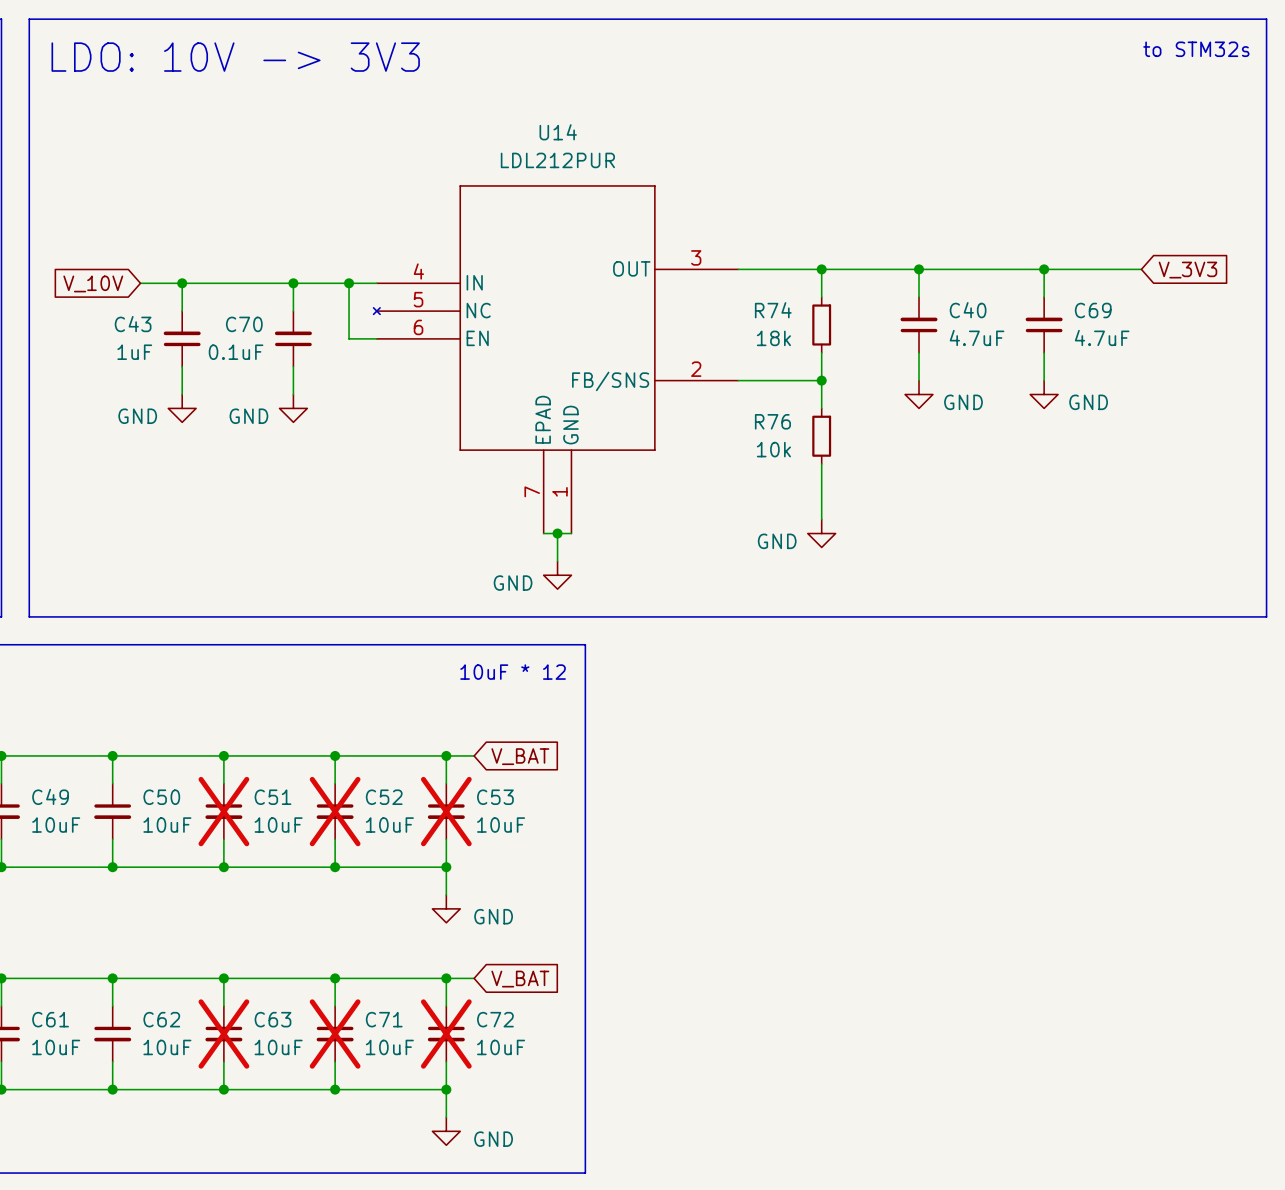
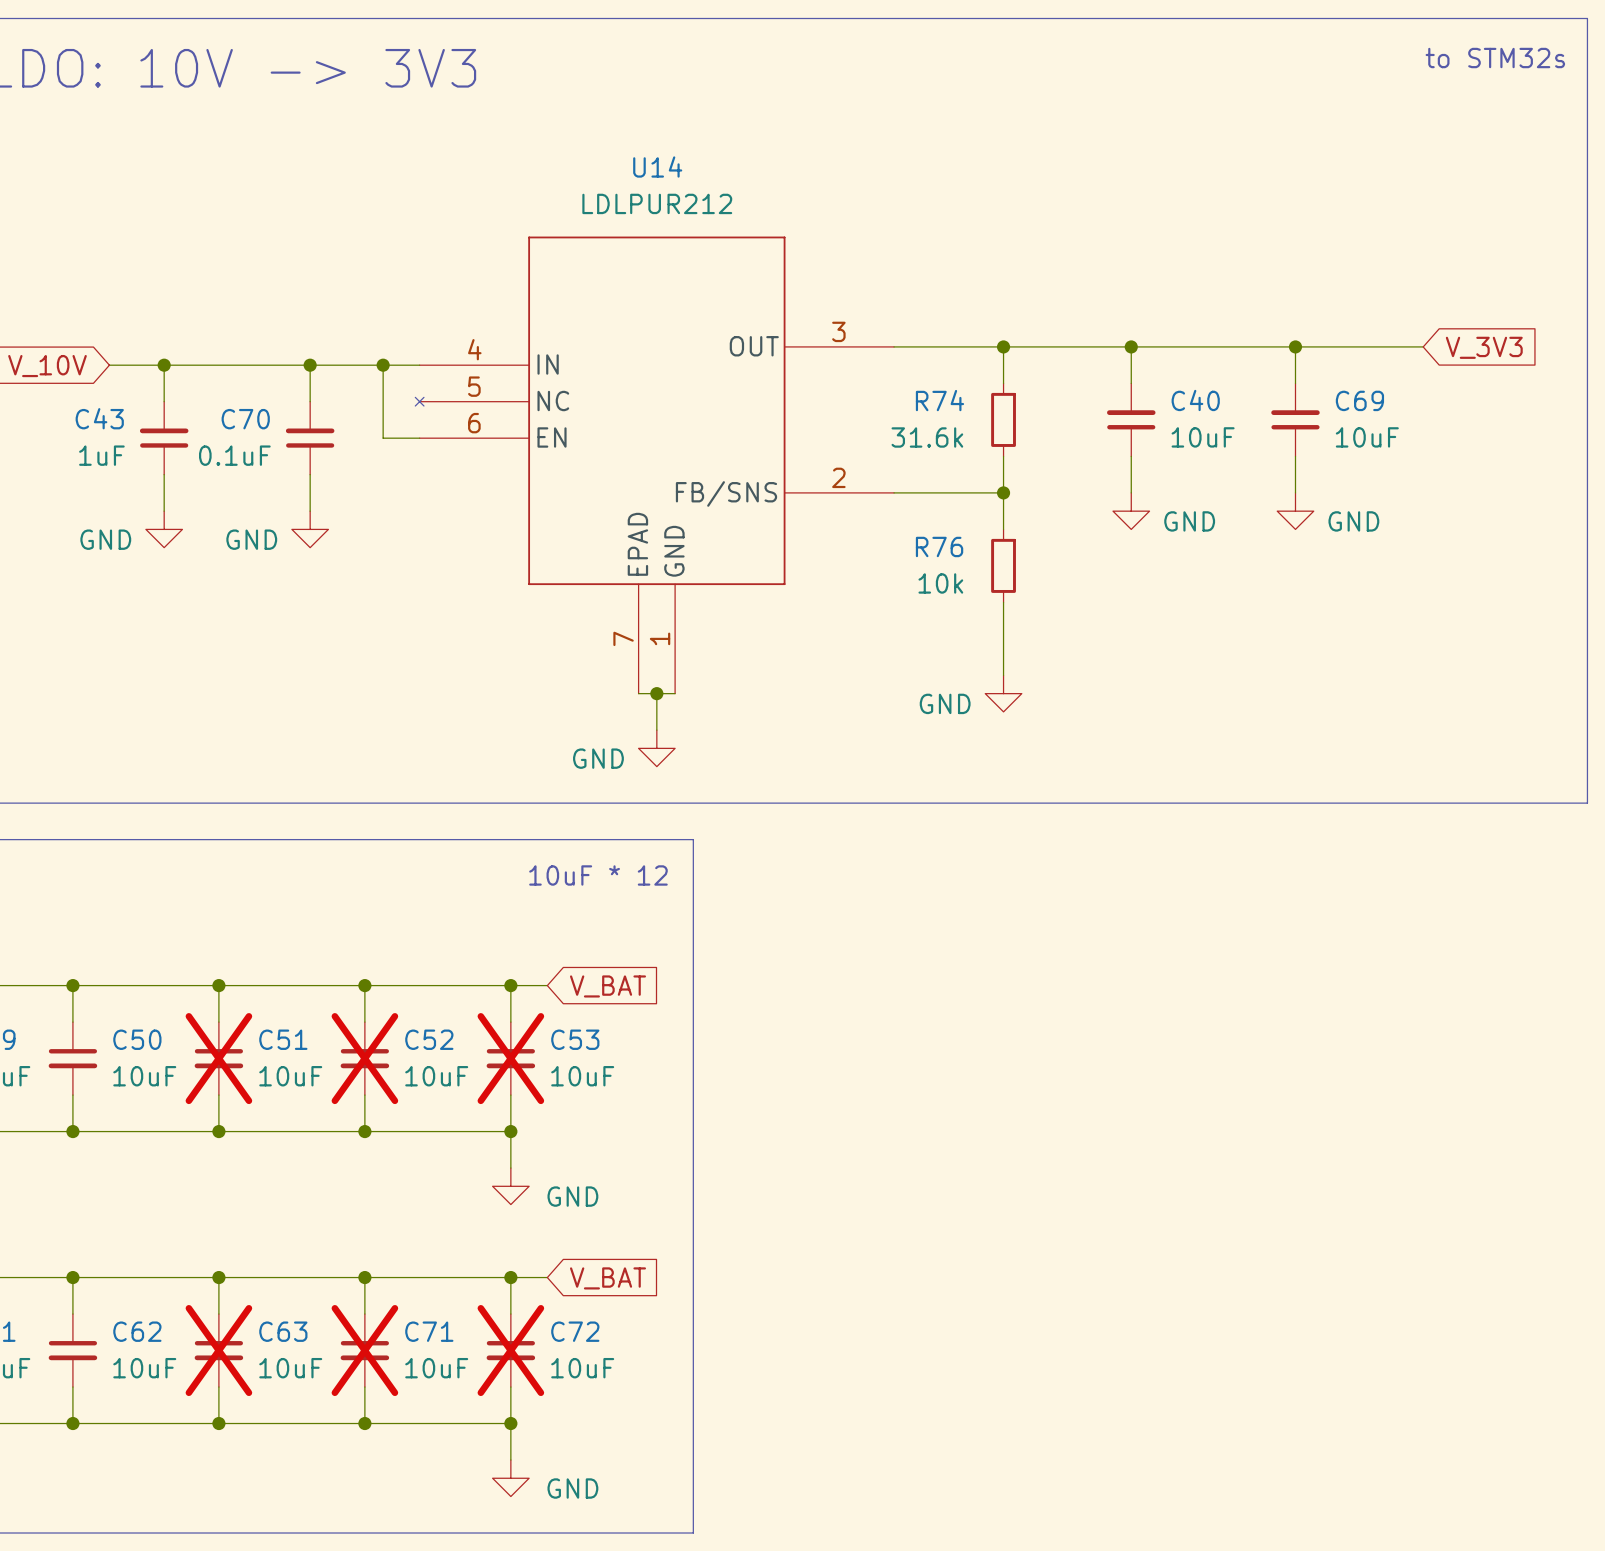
U14 value: LDL212PUR (557, 160) -> LDLPUR212 (657, 203)
C40 value: 4.7uF (977, 337) -> 10uF (1203, 437)
C69 value: 4.7uF (1102, 337) -> 10uF (1367, 437)
R74 value: 18k (773, 338) -> 31.6k (927, 437)

